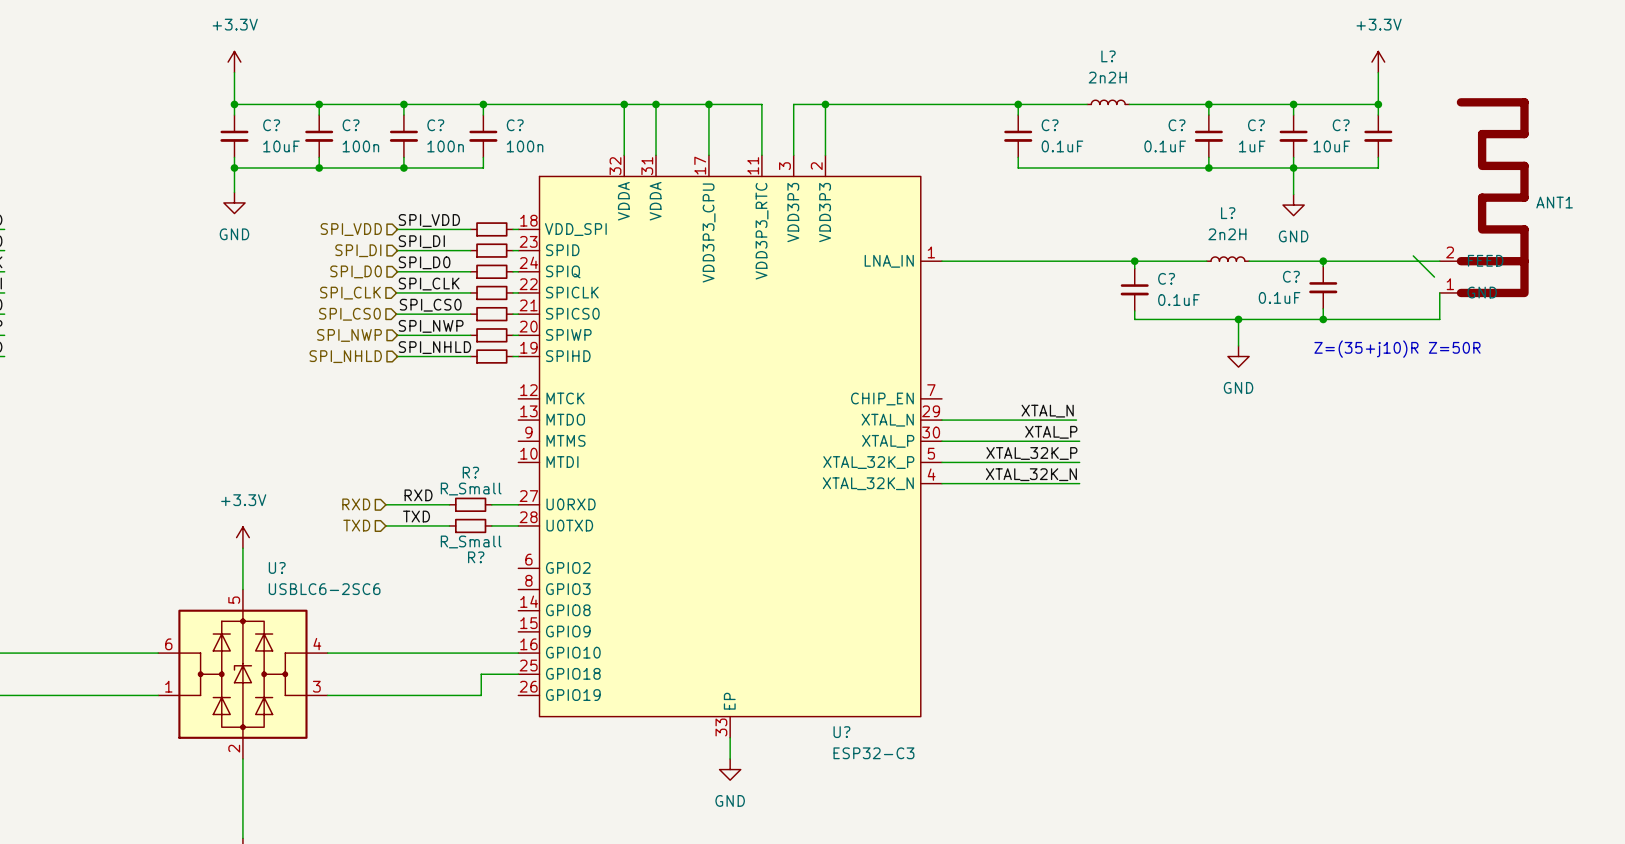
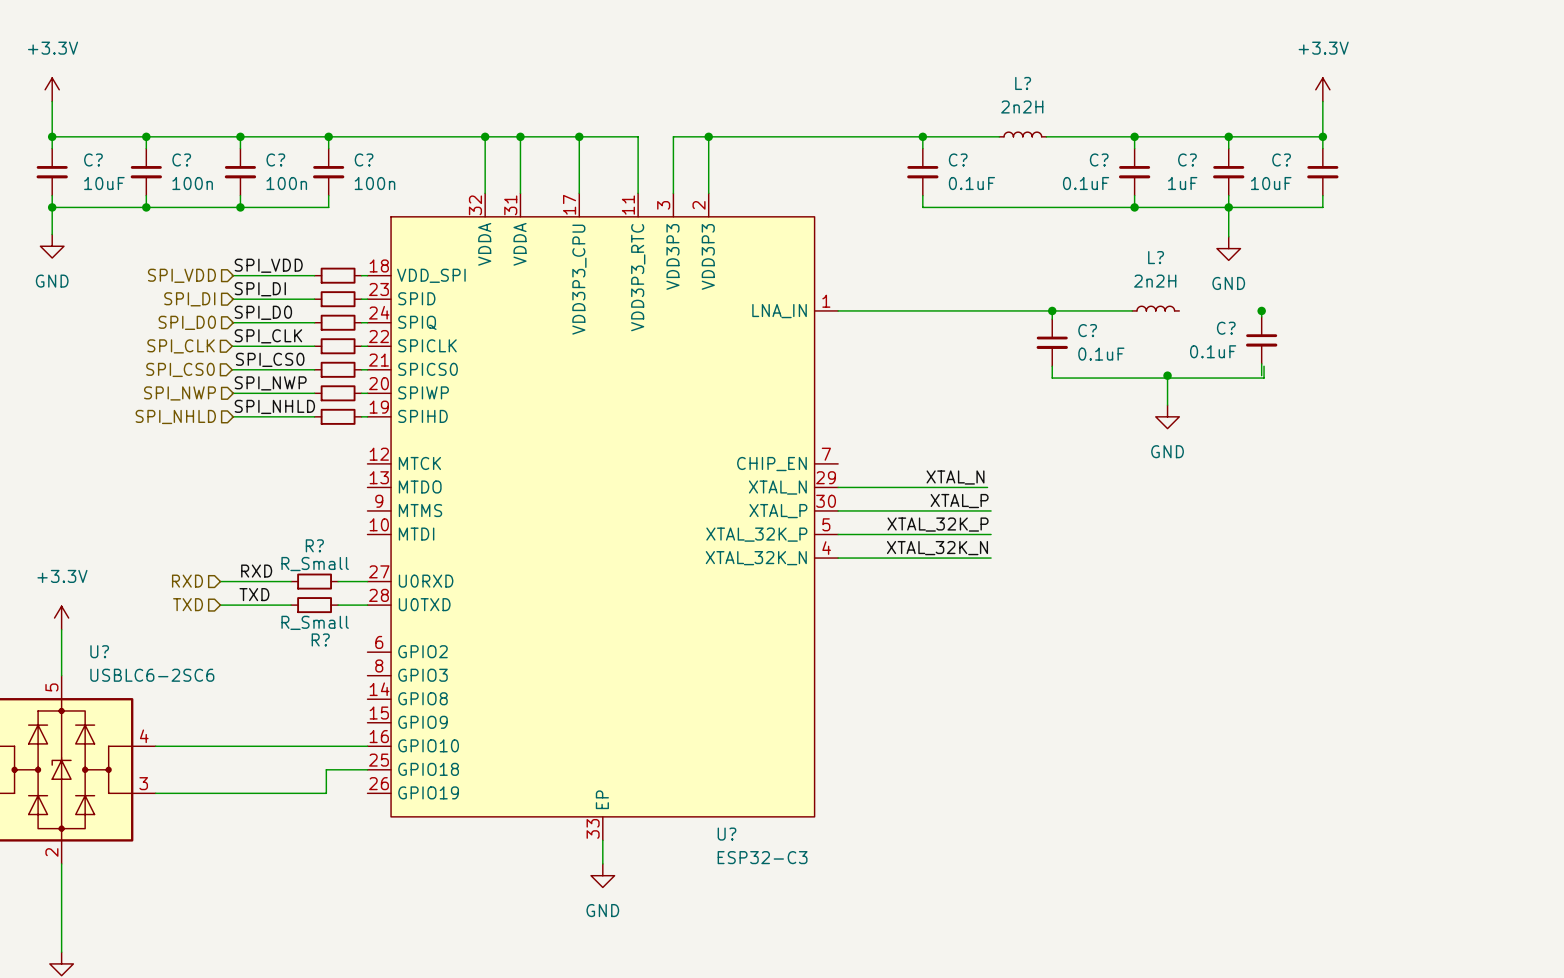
ANT1: (1484, 197) -> none
wire: (1413, 255) (1434, 277) -> none
wire: (1249, 261) (1439, 261) -> none
wire: (1439, 292) (1439, 319) (1134, 319) -> (1264, 366) (1264, 378) (1052, 378) (1052, 375)
junction: (1323, 319) -> none
text: Z=(35+j10)R Z=50R (1397, 349) -> none

